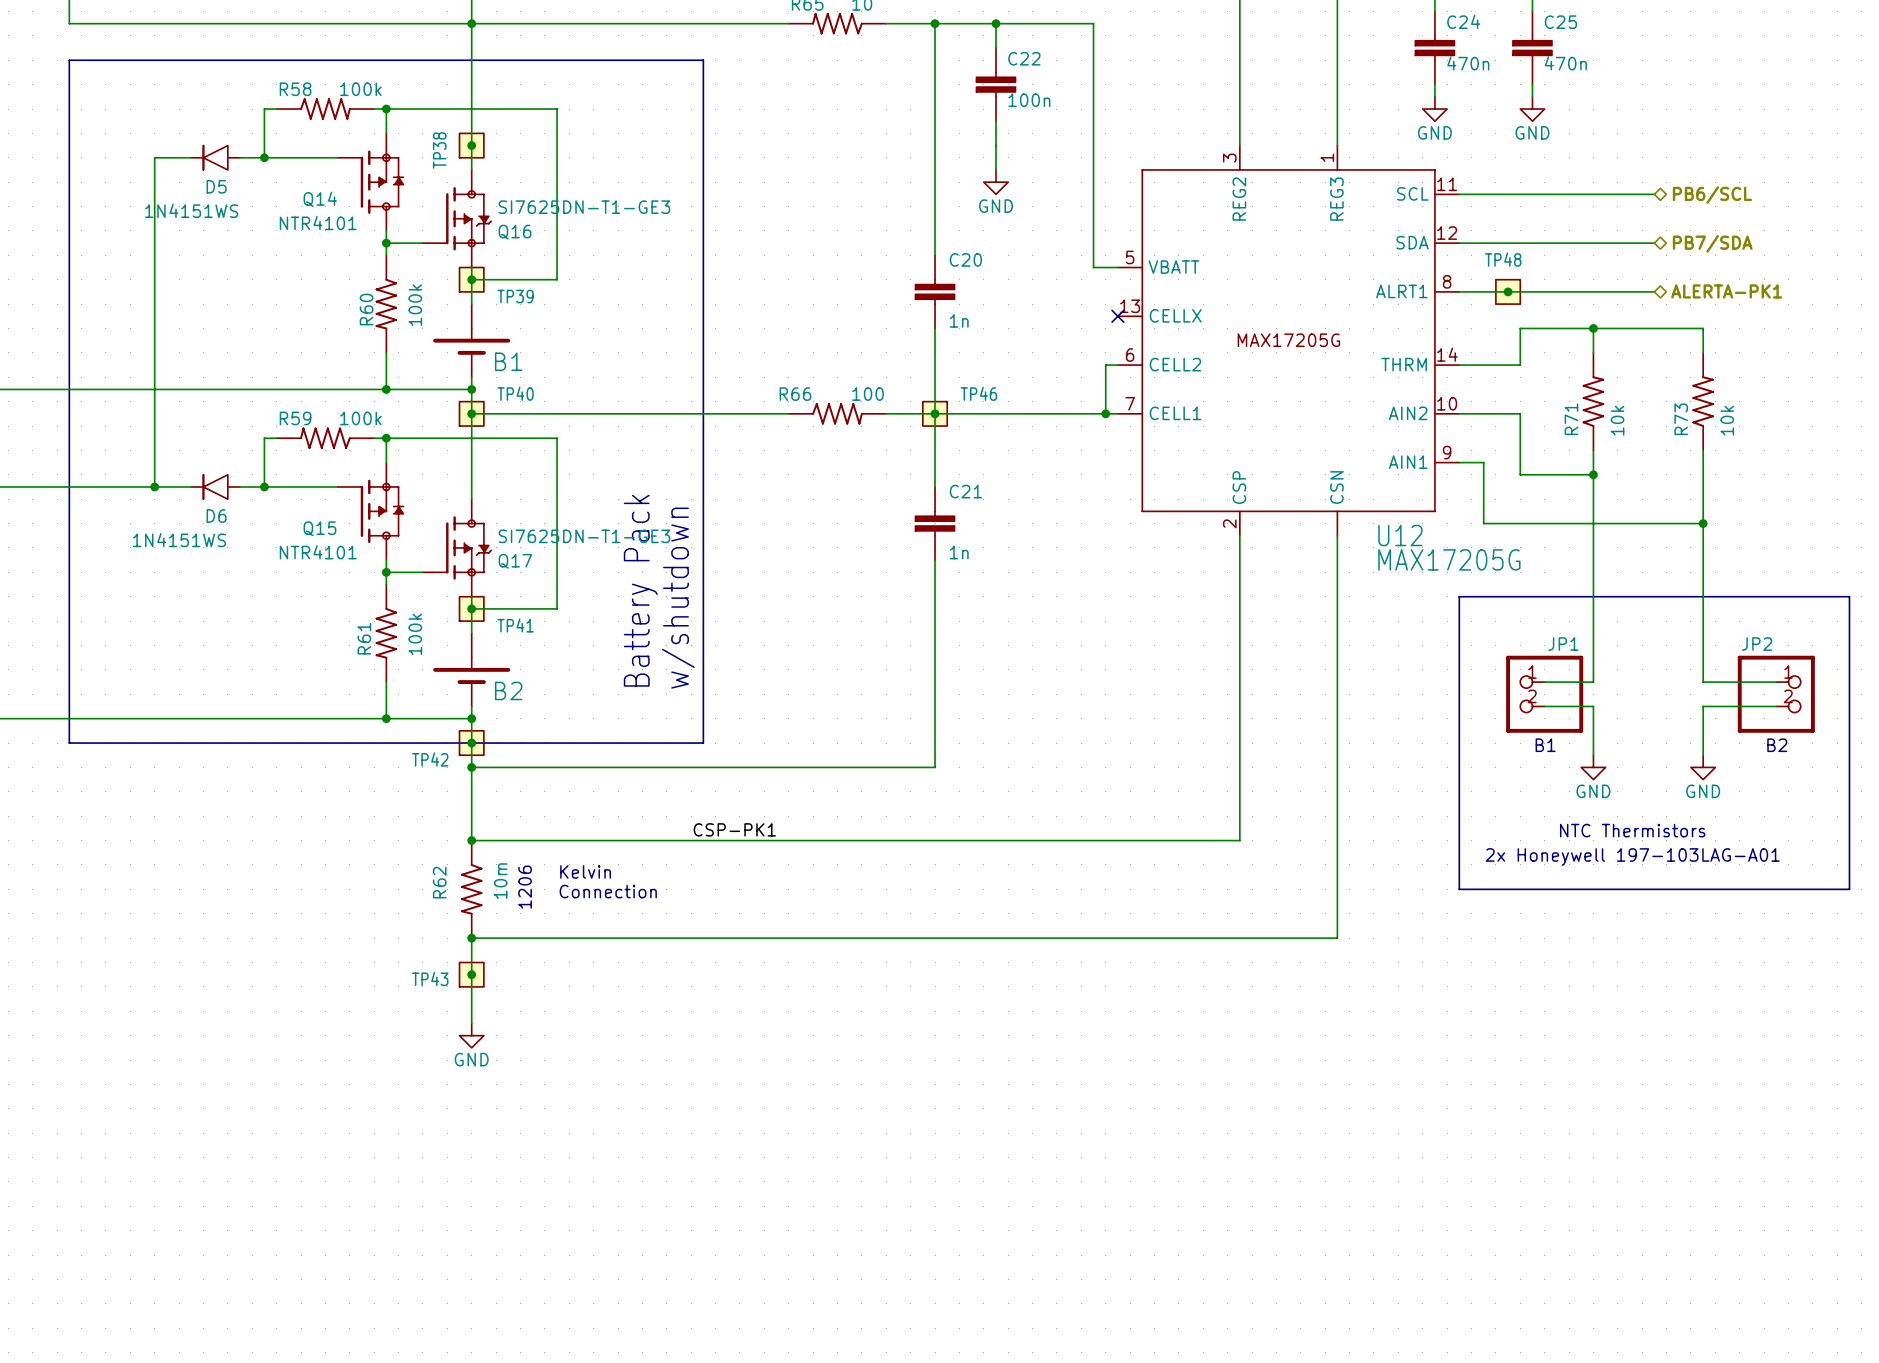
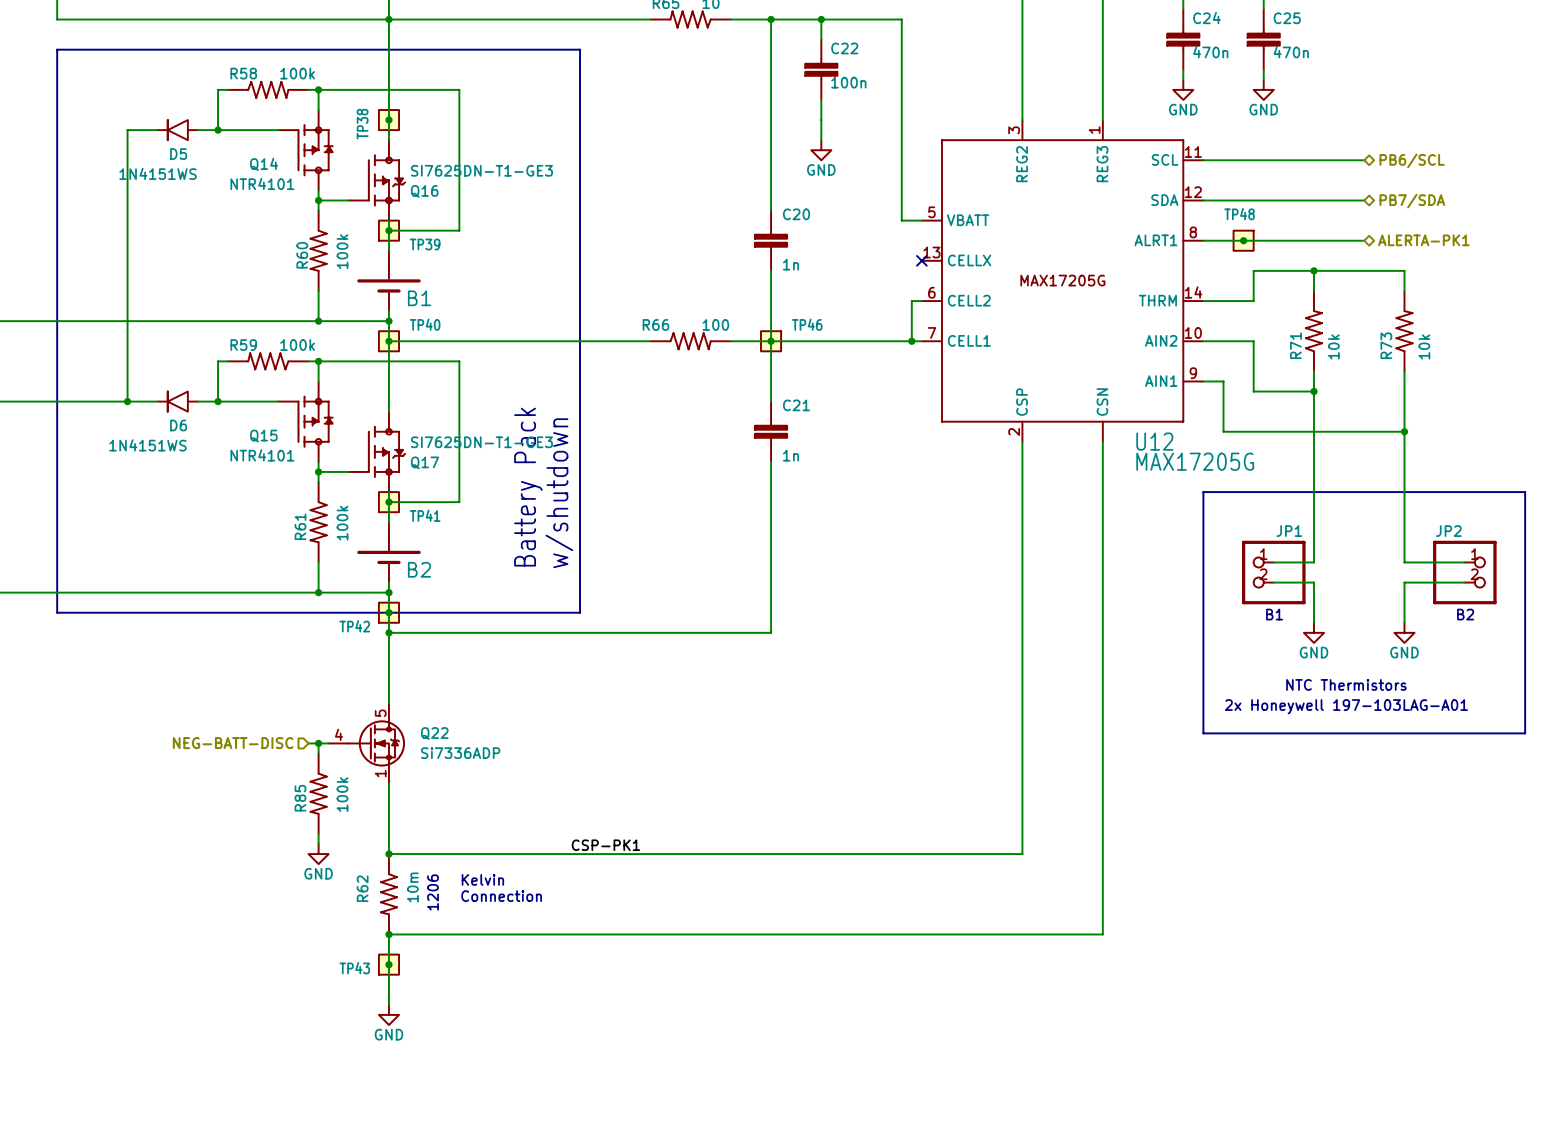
label position: CSP-PK1 (734, 829) -> CSP-PK1 (605, 845)
wire: (471, 840) (1239, 840) -> (388, 843) (388, 854) (1022, 854) (1022, 693)
junction: (471, 840) -> none
text position: Kelvin (585, 871) -> Kelvin (482, 879)
text position: 1206 (525, 887) -> 1206 (432, 892)
R62 position: (471, 889) -> (388, 894)
text position: Connection (608, 891) -> Connection (501, 896)
hierarchical label: none -> NEG-BATT-DISC (233, 743)
wire: none -> (308, 743) (328, 743)
wire: none -> (318, 743) (318, 753)
junction: none -> (318, 743)
Q22: none -> Si7336ADP (366, 743)
junction: (471, 938) -> none
wire: (1337, 938) (471, 938) (471, 950) -> (1102, 773) (1102, 934) (388, 934) (388, 1004)
R85: none -> 100k (318, 793)
junction: (471, 974) -> none
TP43 position: (471, 974) -> (388, 964)
wire: none -> (318, 833) (318, 843)
junction: none -> (388, 854)
power symbol position: GND (471, 1035) -> GND (318, 854)
junction: none -> (388, 934)
junction: none -> (388, 964)
power symbol: none -> GND (388, 1014)

